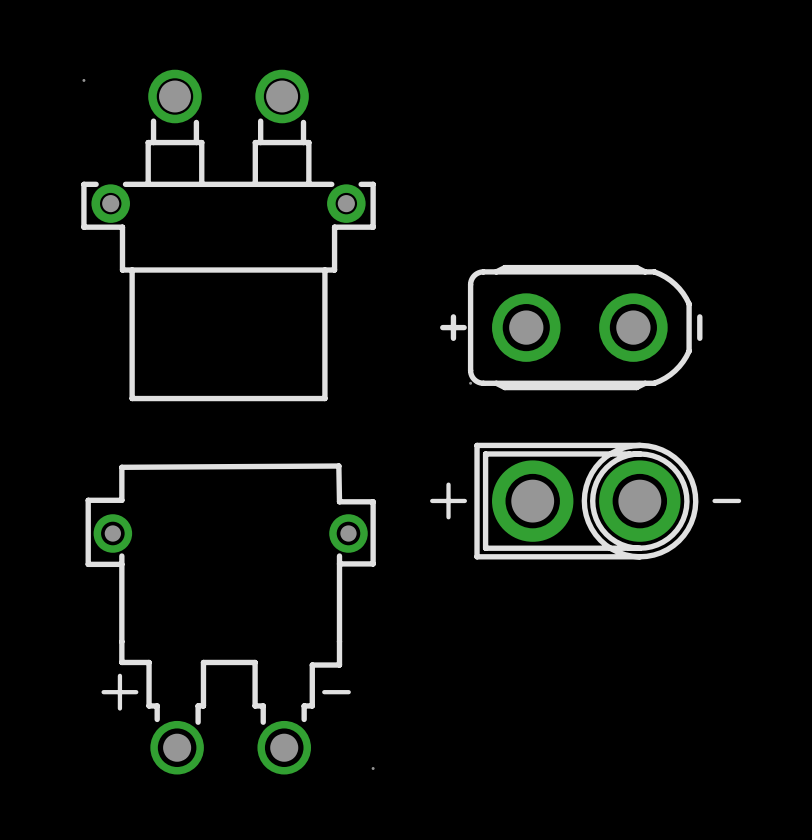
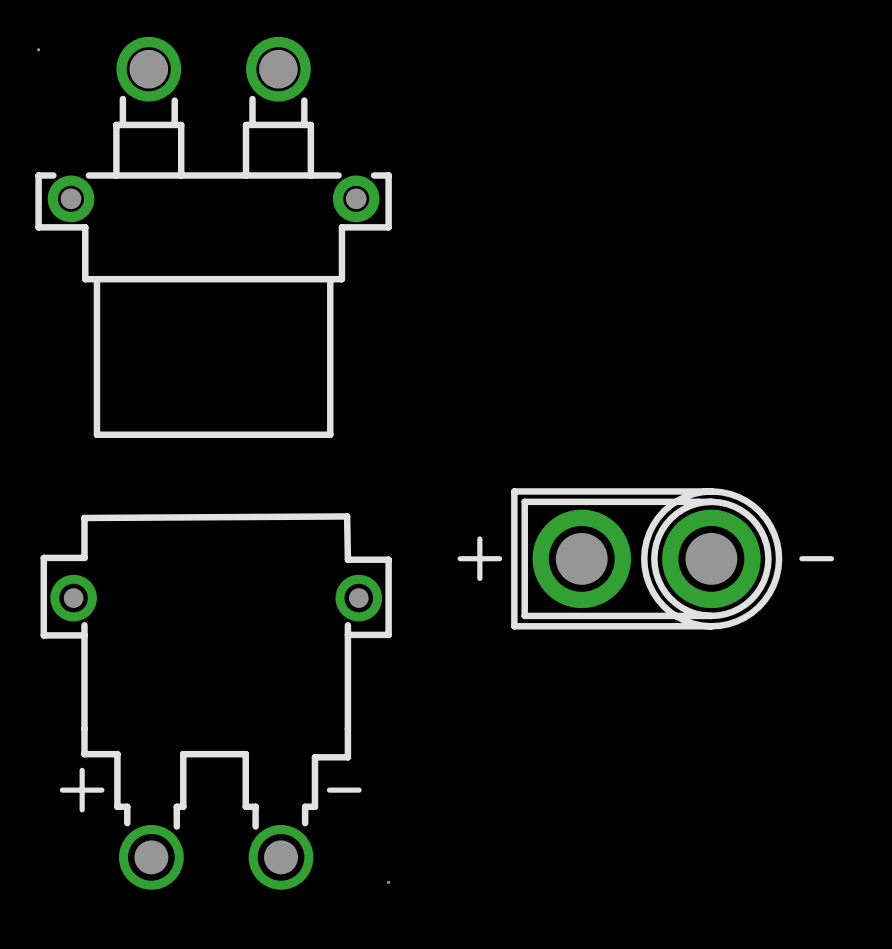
part: (571, 327) -> none

